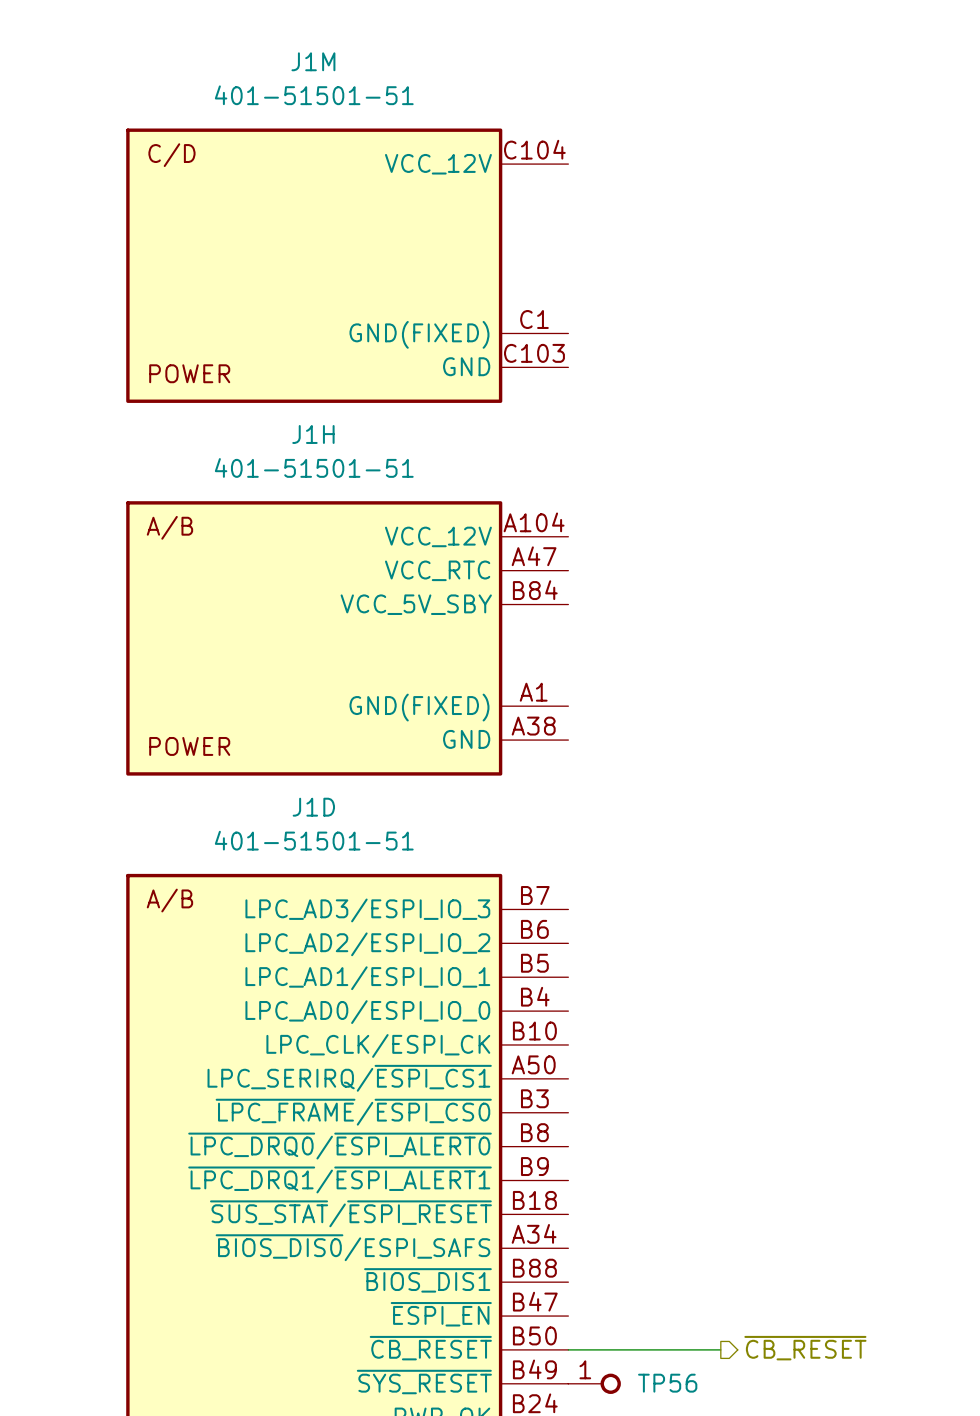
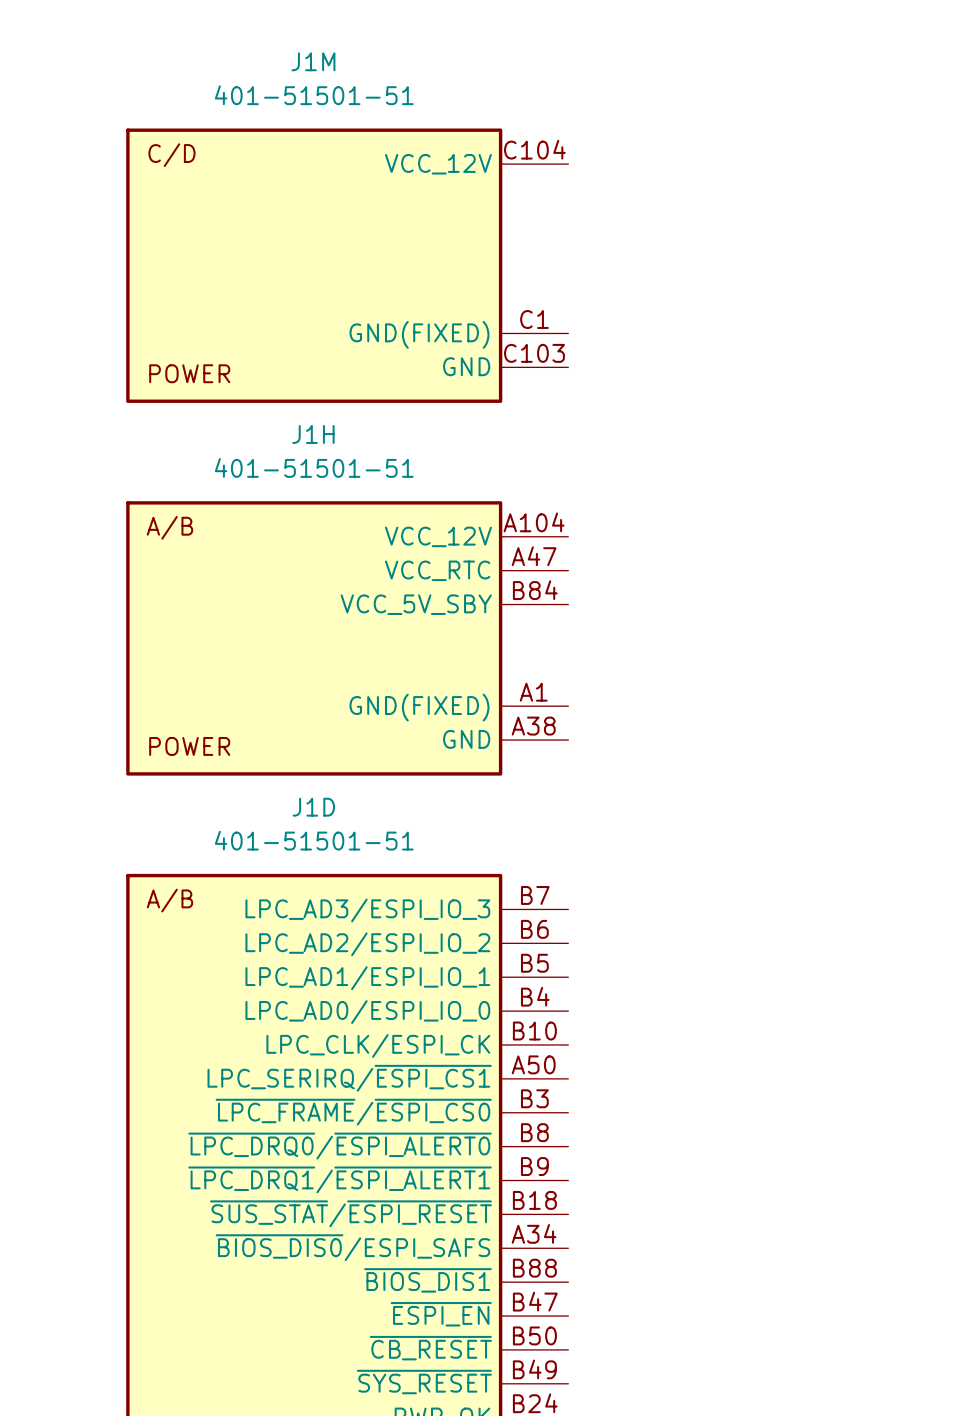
hierarchical label: ~{CB_RESET} (805, 1348) -> none
wire: (568, 1349) (720, 1349) -> none
TP56: (594, 1383) -> none

